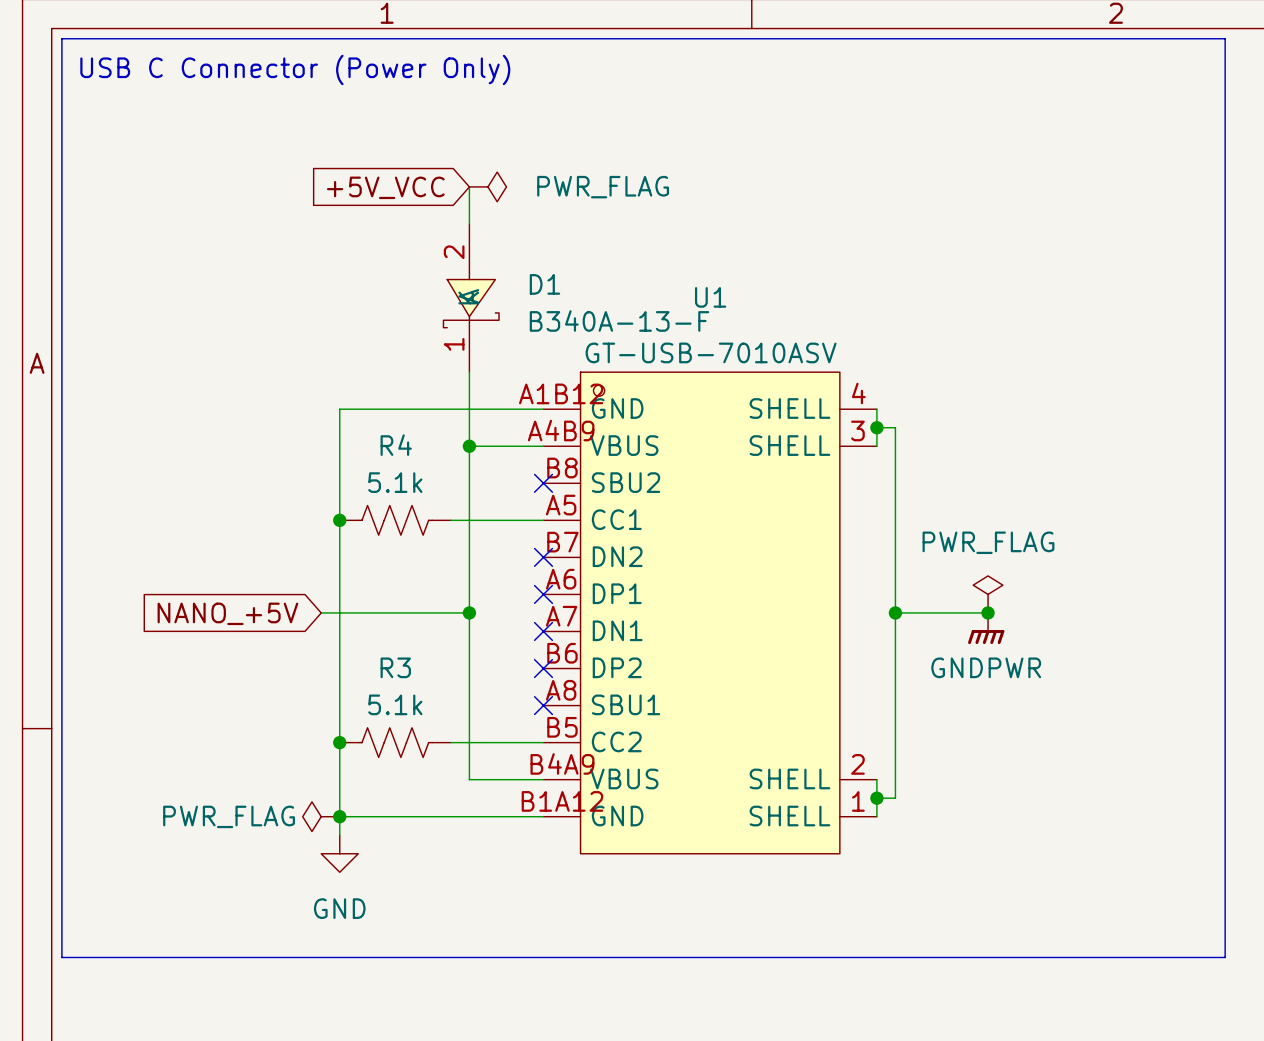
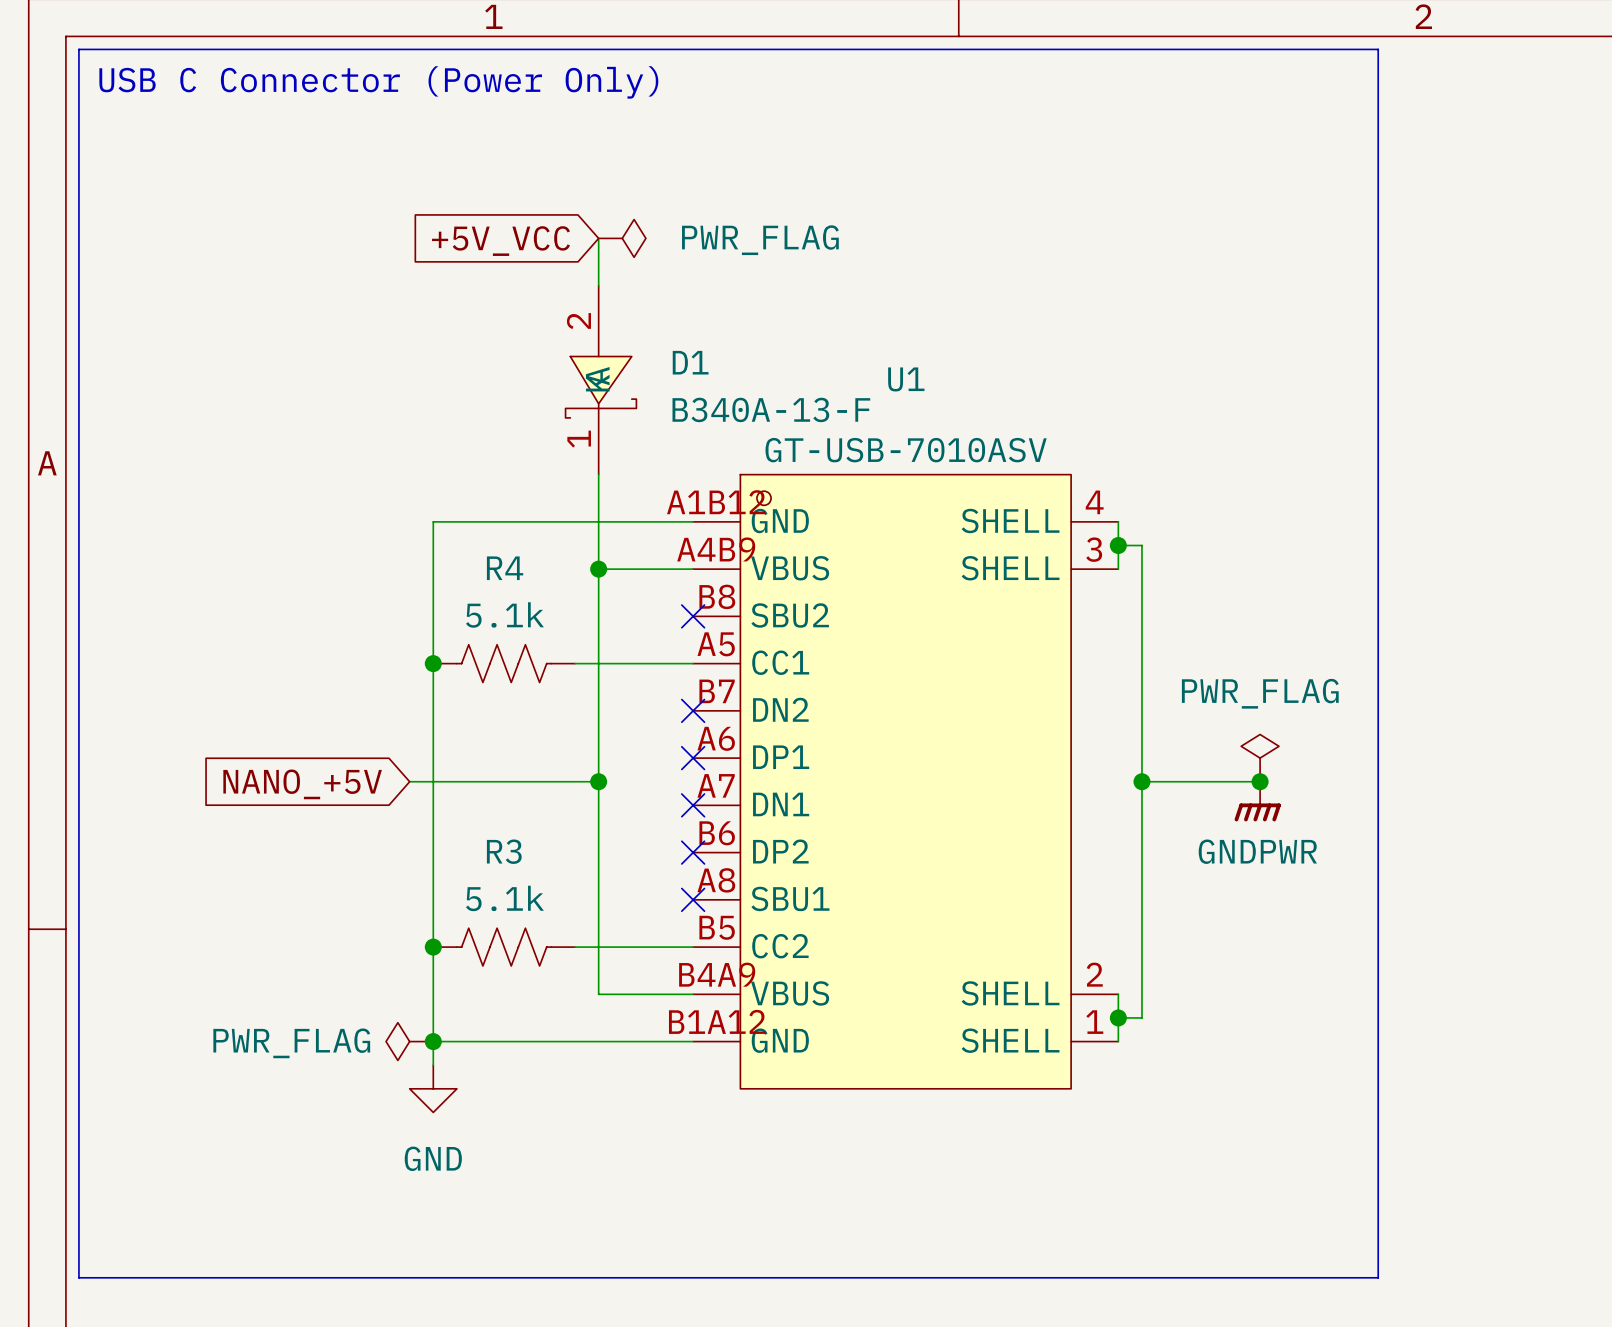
line: (1080, 38) (1225, 38) (1225, 957) (61, 957) -> (1378, 49) (1378, 1277) (78, 1277) (78, 1221)
text position: USB C Connector (Power Only) (295, 69) -> USB C Connector (Power Only) (378, 82)

